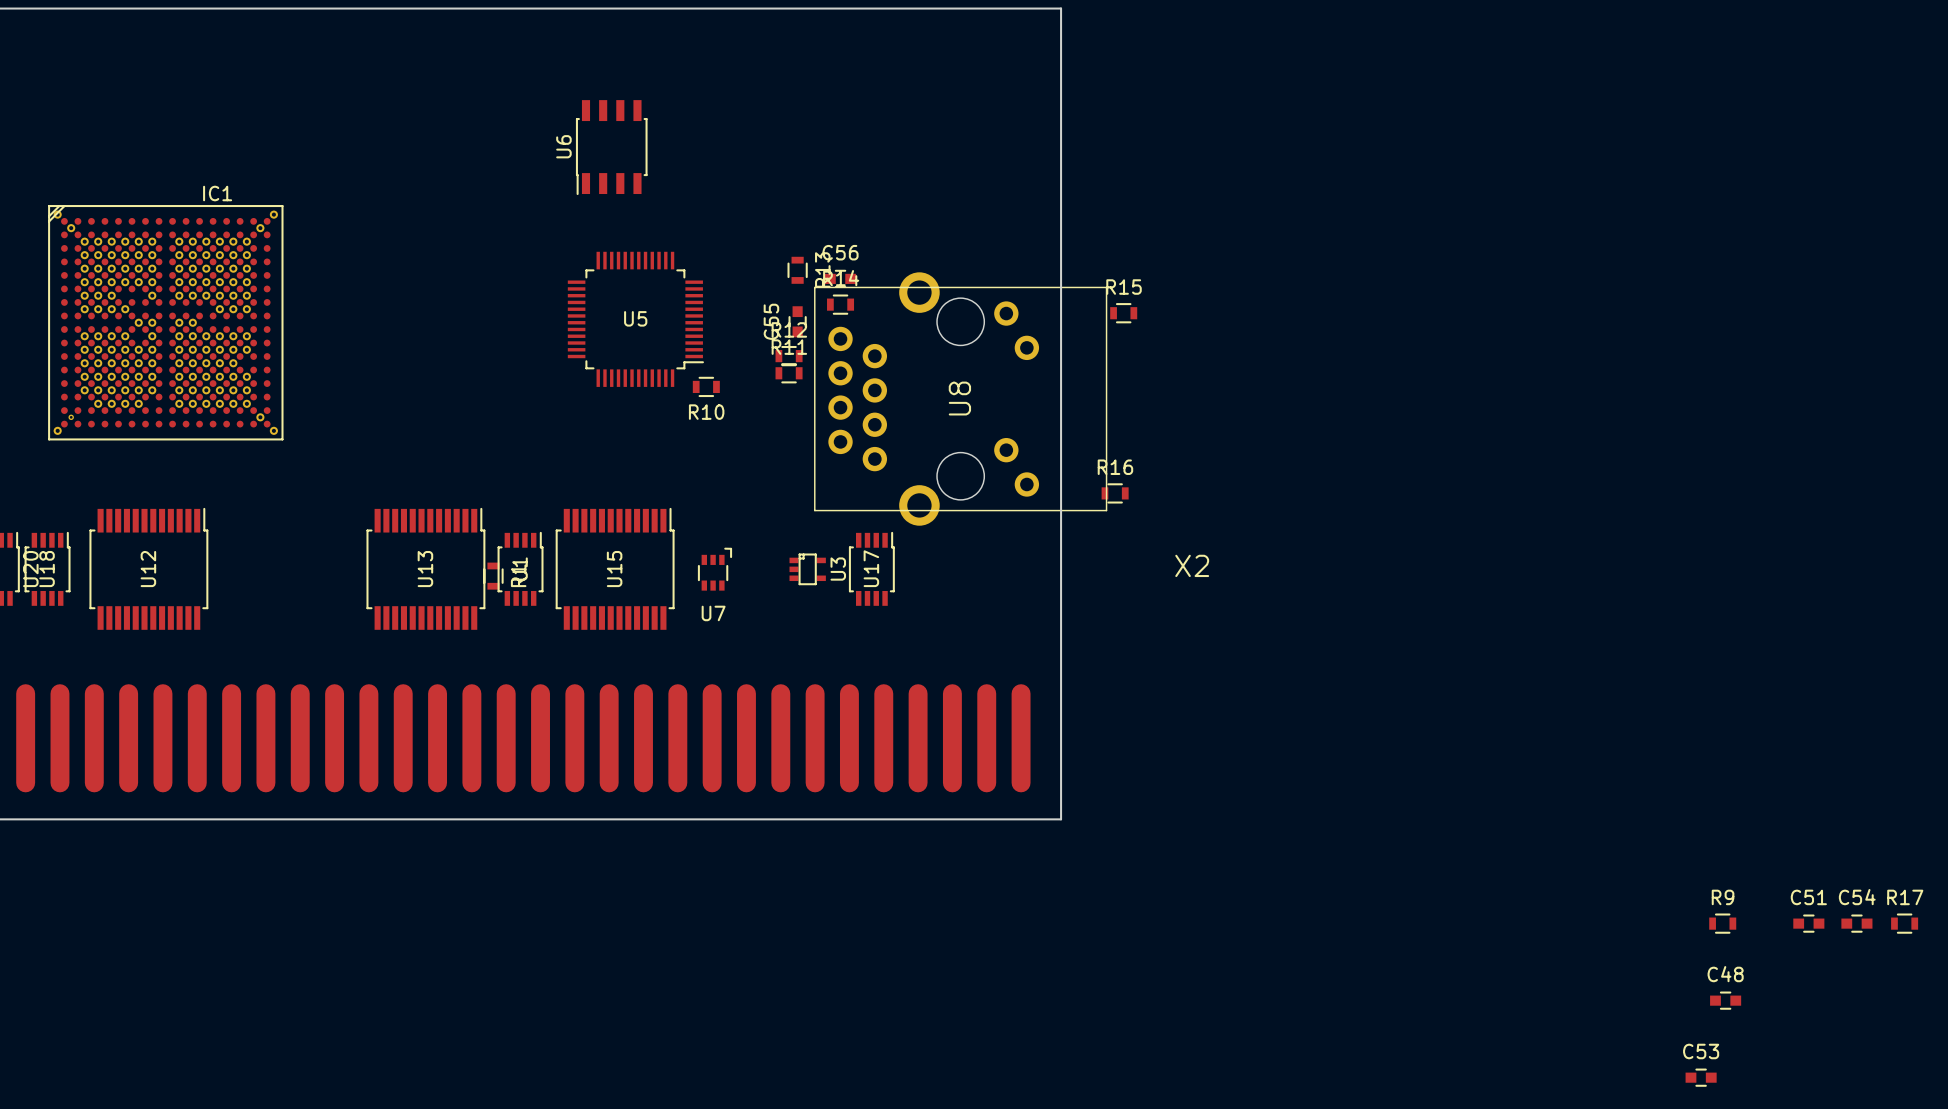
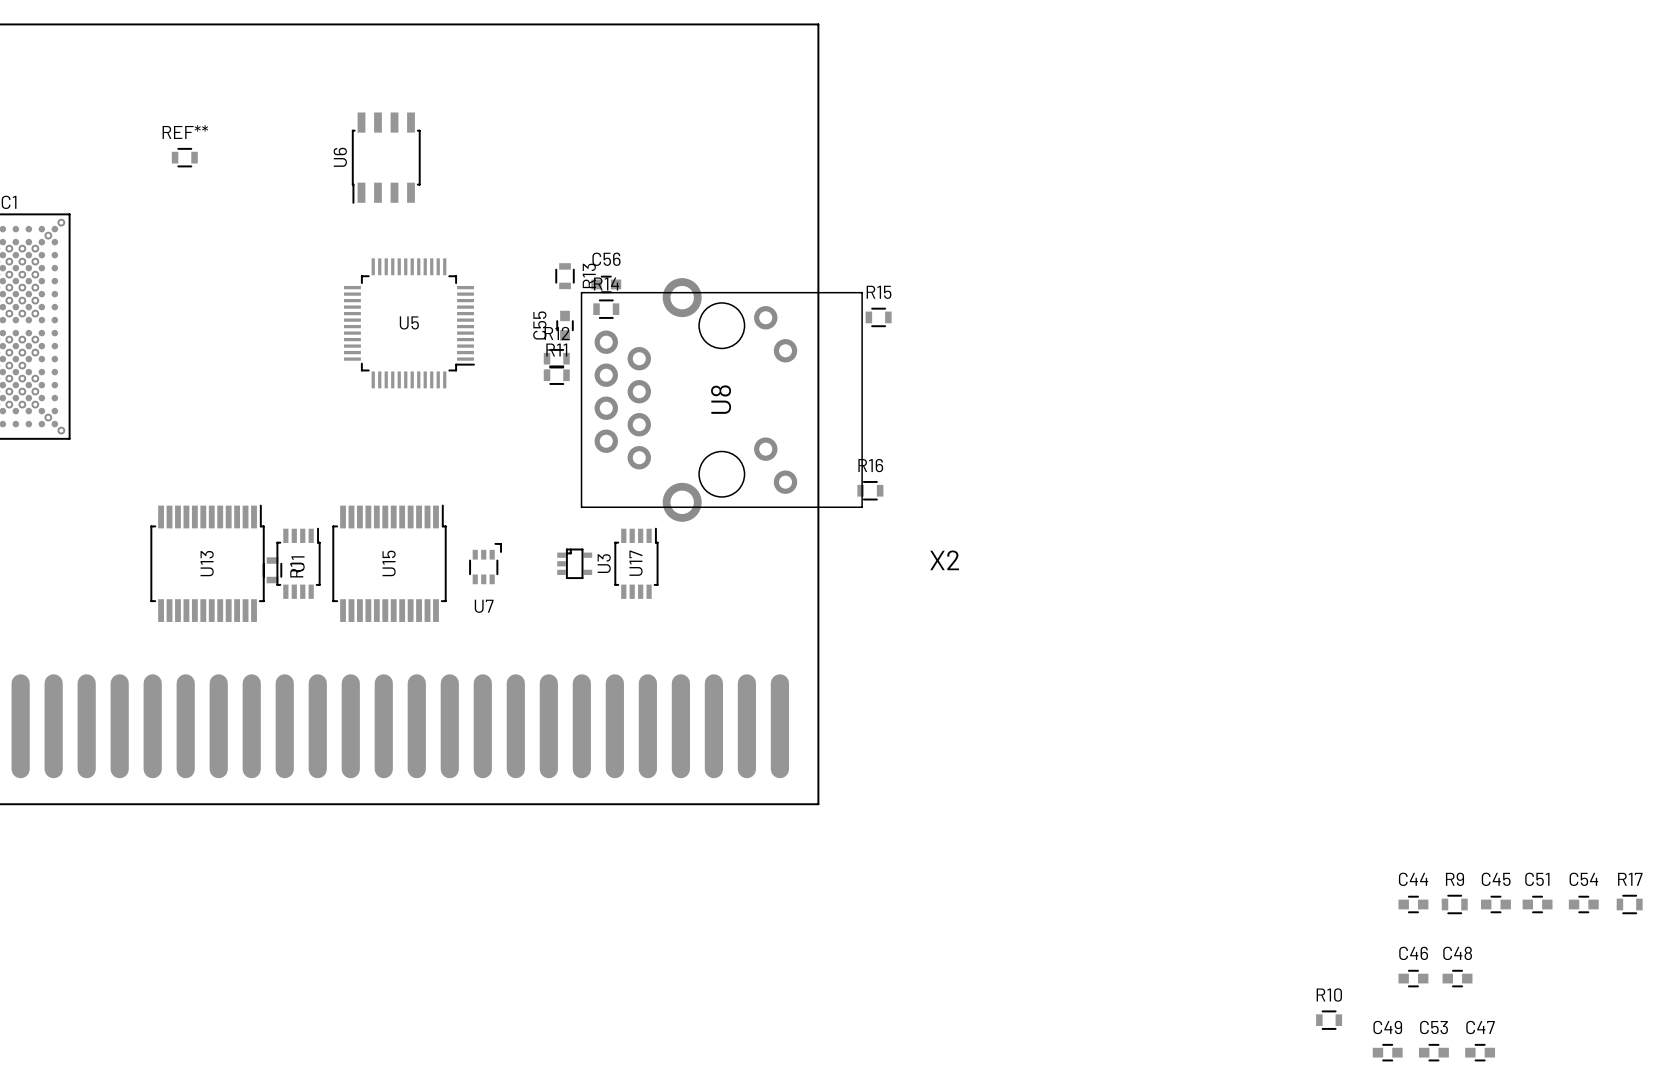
REF**: none -> (184, 157)
R10 position: (706, 386) -> (1329, 1020)
R10 name position: R10 (706, 412) -> R10 (1329, 994)
C44: none -> (1413, 904)
C45: none -> (1495, 904)
C46: none -> (1413, 978)
C49: none -> (1387, 1052)
C47: none -> (1480, 1052)

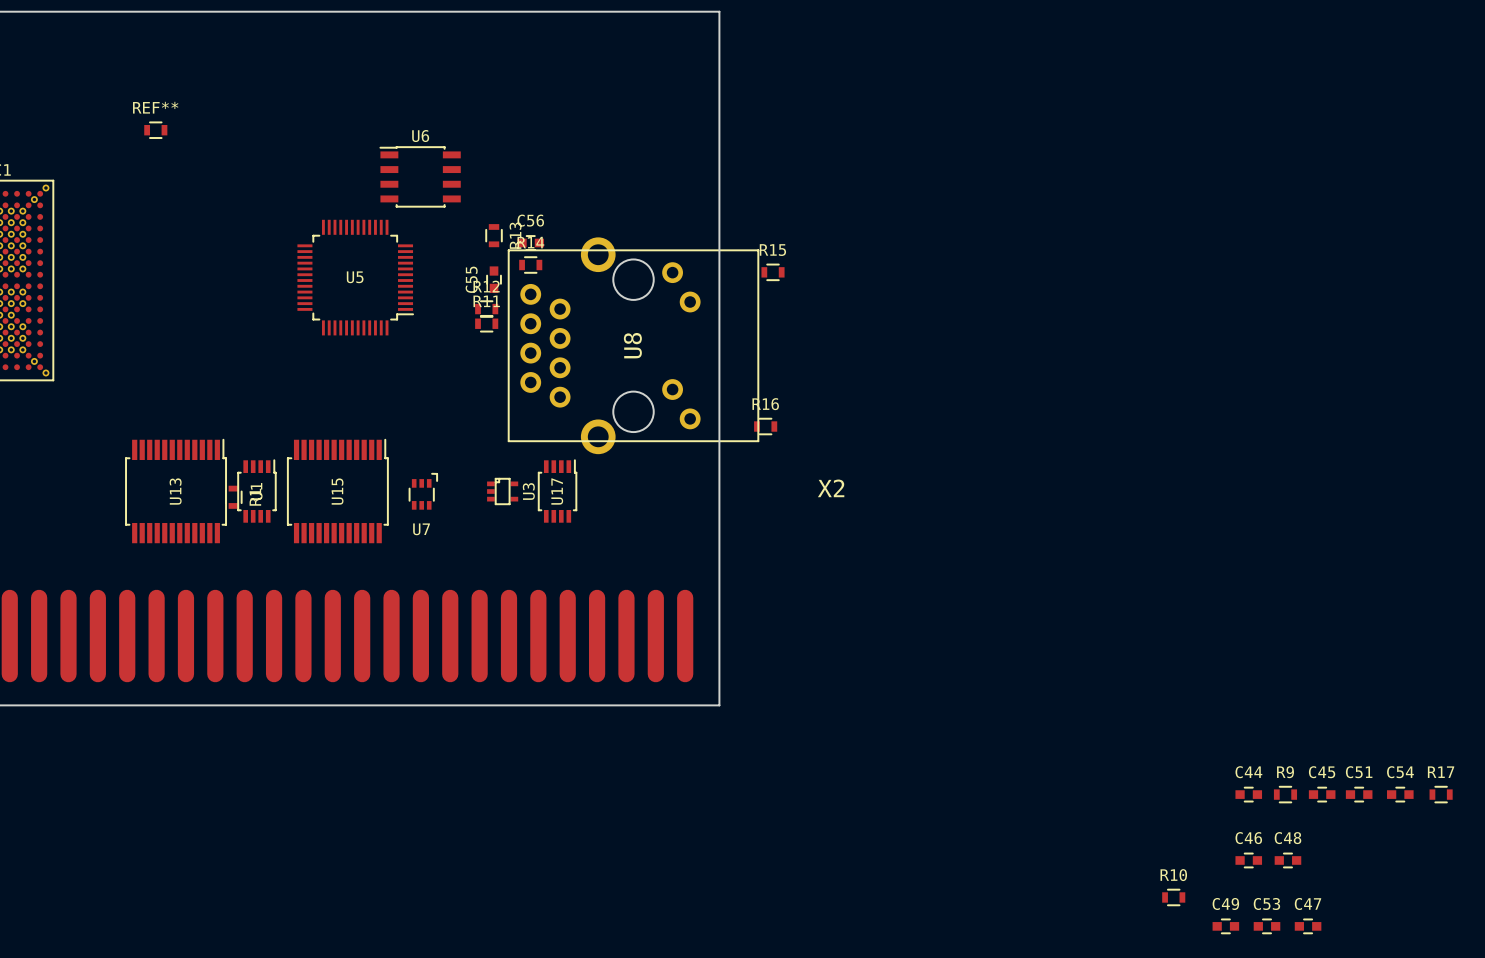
U6 rotation: 0° (386, 158) -> 90° clockwise (420, 176)
U6 position: (386, 158) -> (420, 176)

